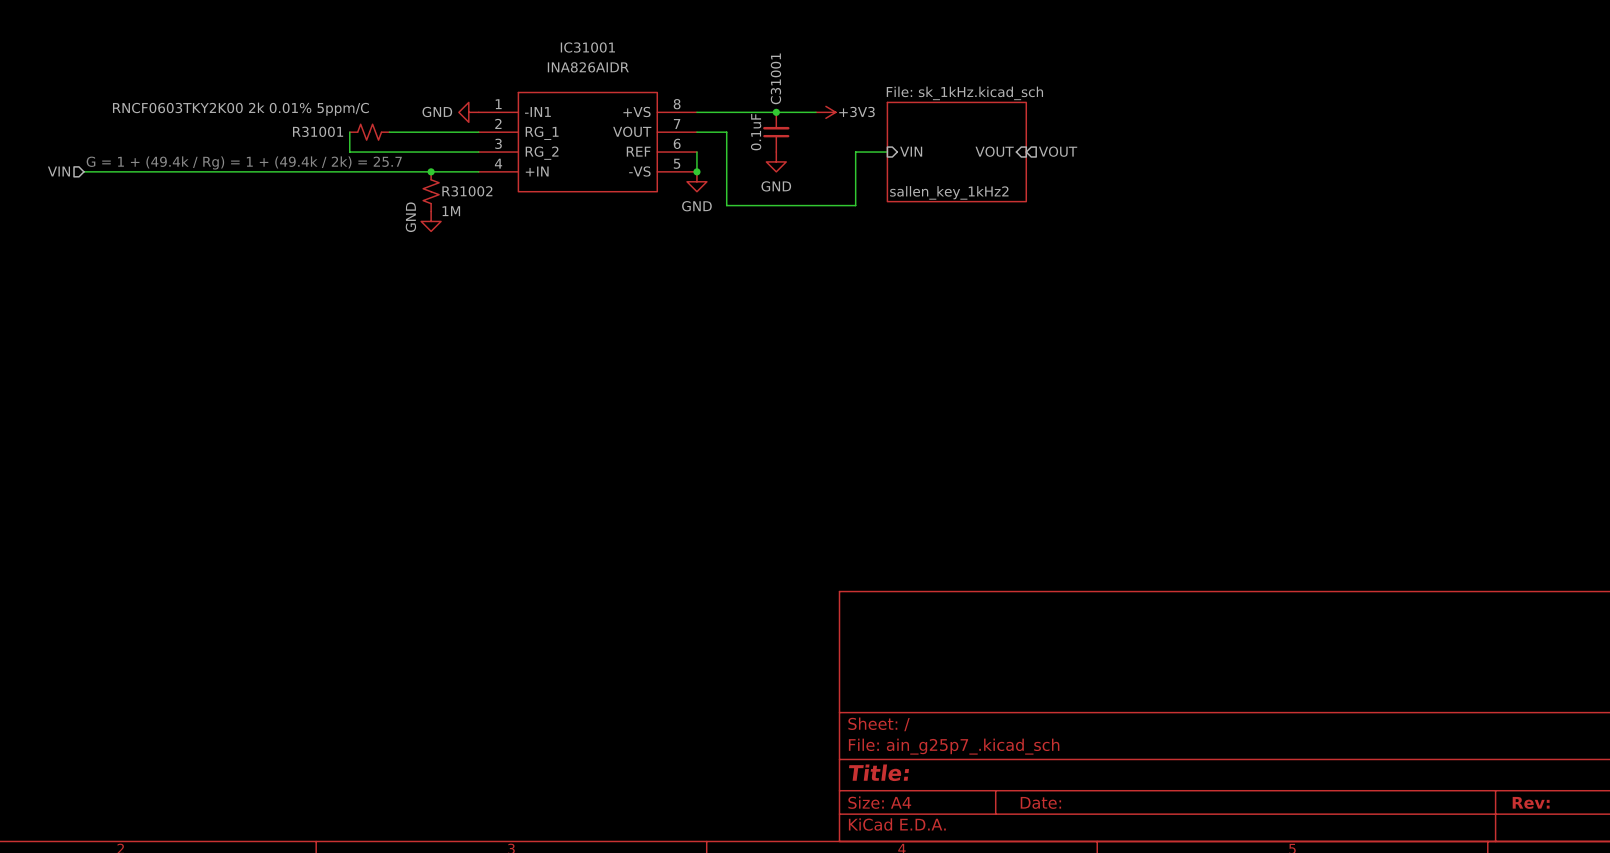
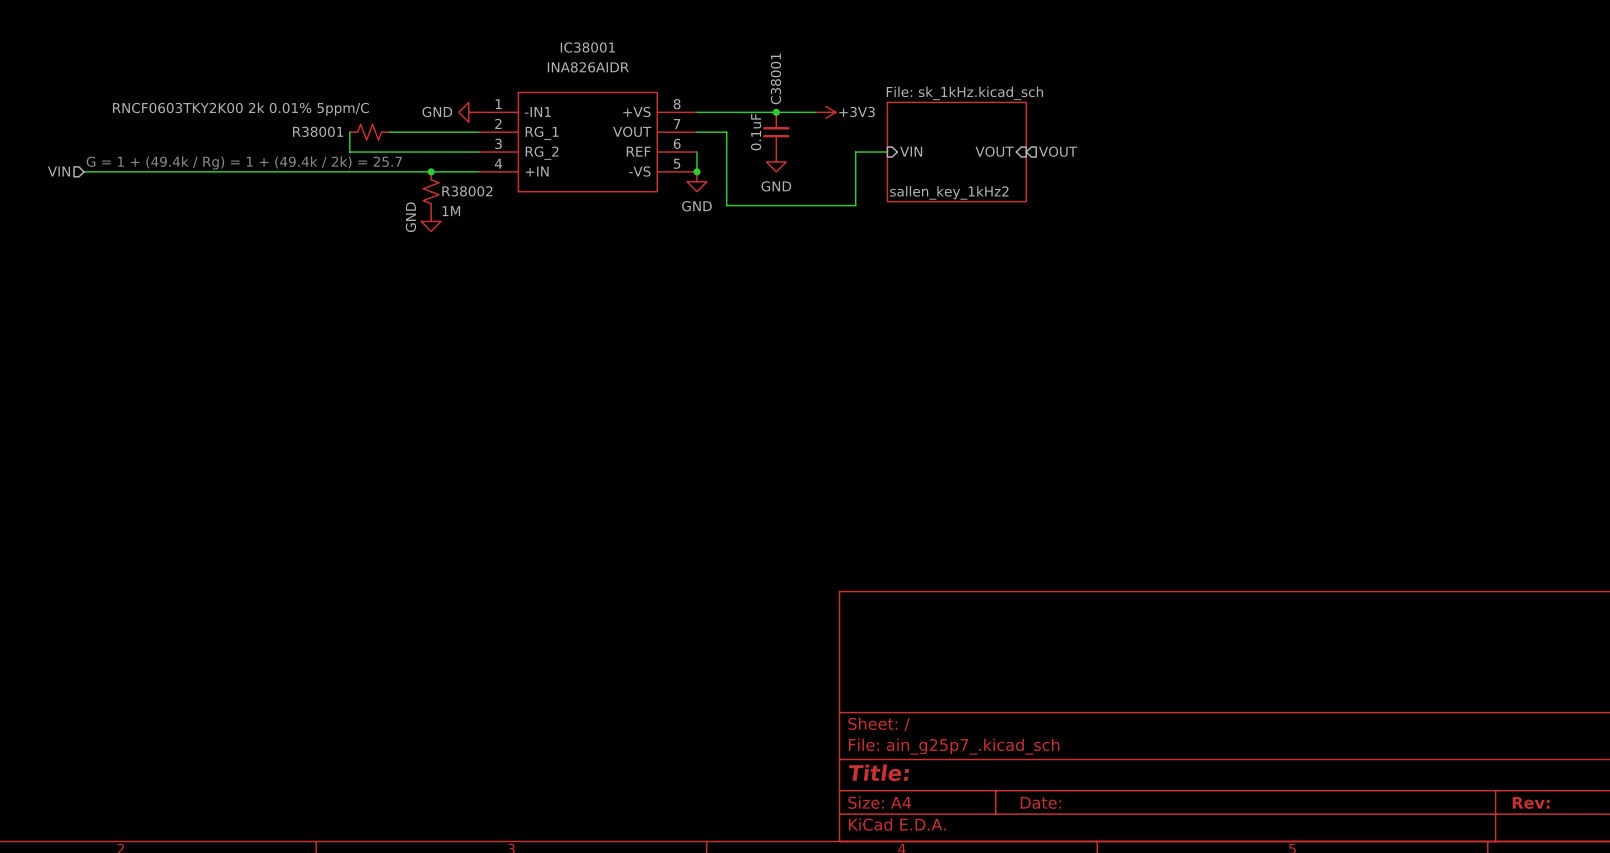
IC31001 name: IC31001 (587, 47) -> IC38001 (587, 47)
C31001 name: C31001 (775, 78) -> C38001 (775, 78)
R31001 name: R31001 (318, 131) -> R38001 (318, 131)
R31002 name: R31002 (467, 191) -> R38002 (467, 191)

